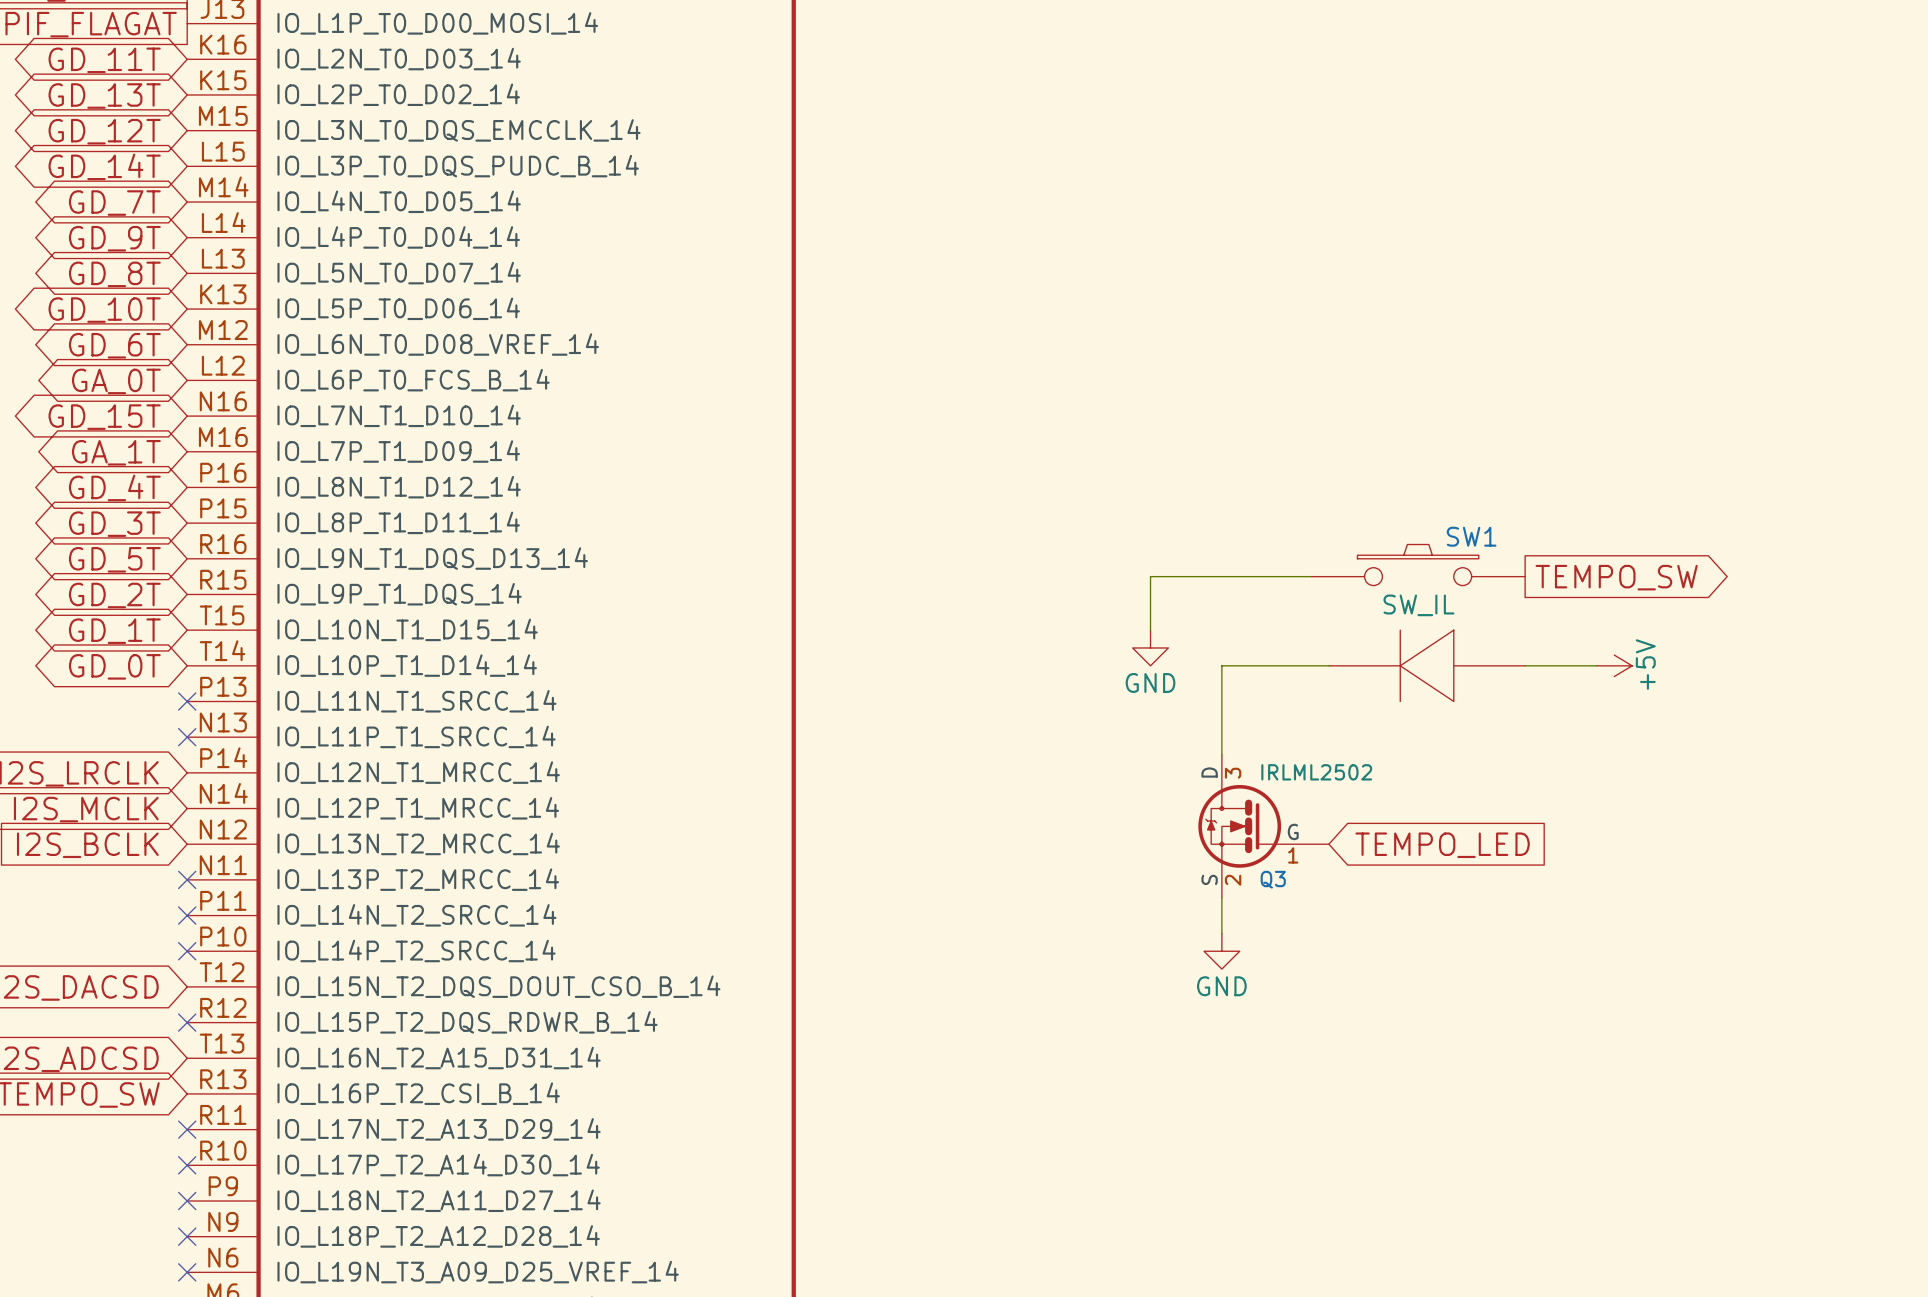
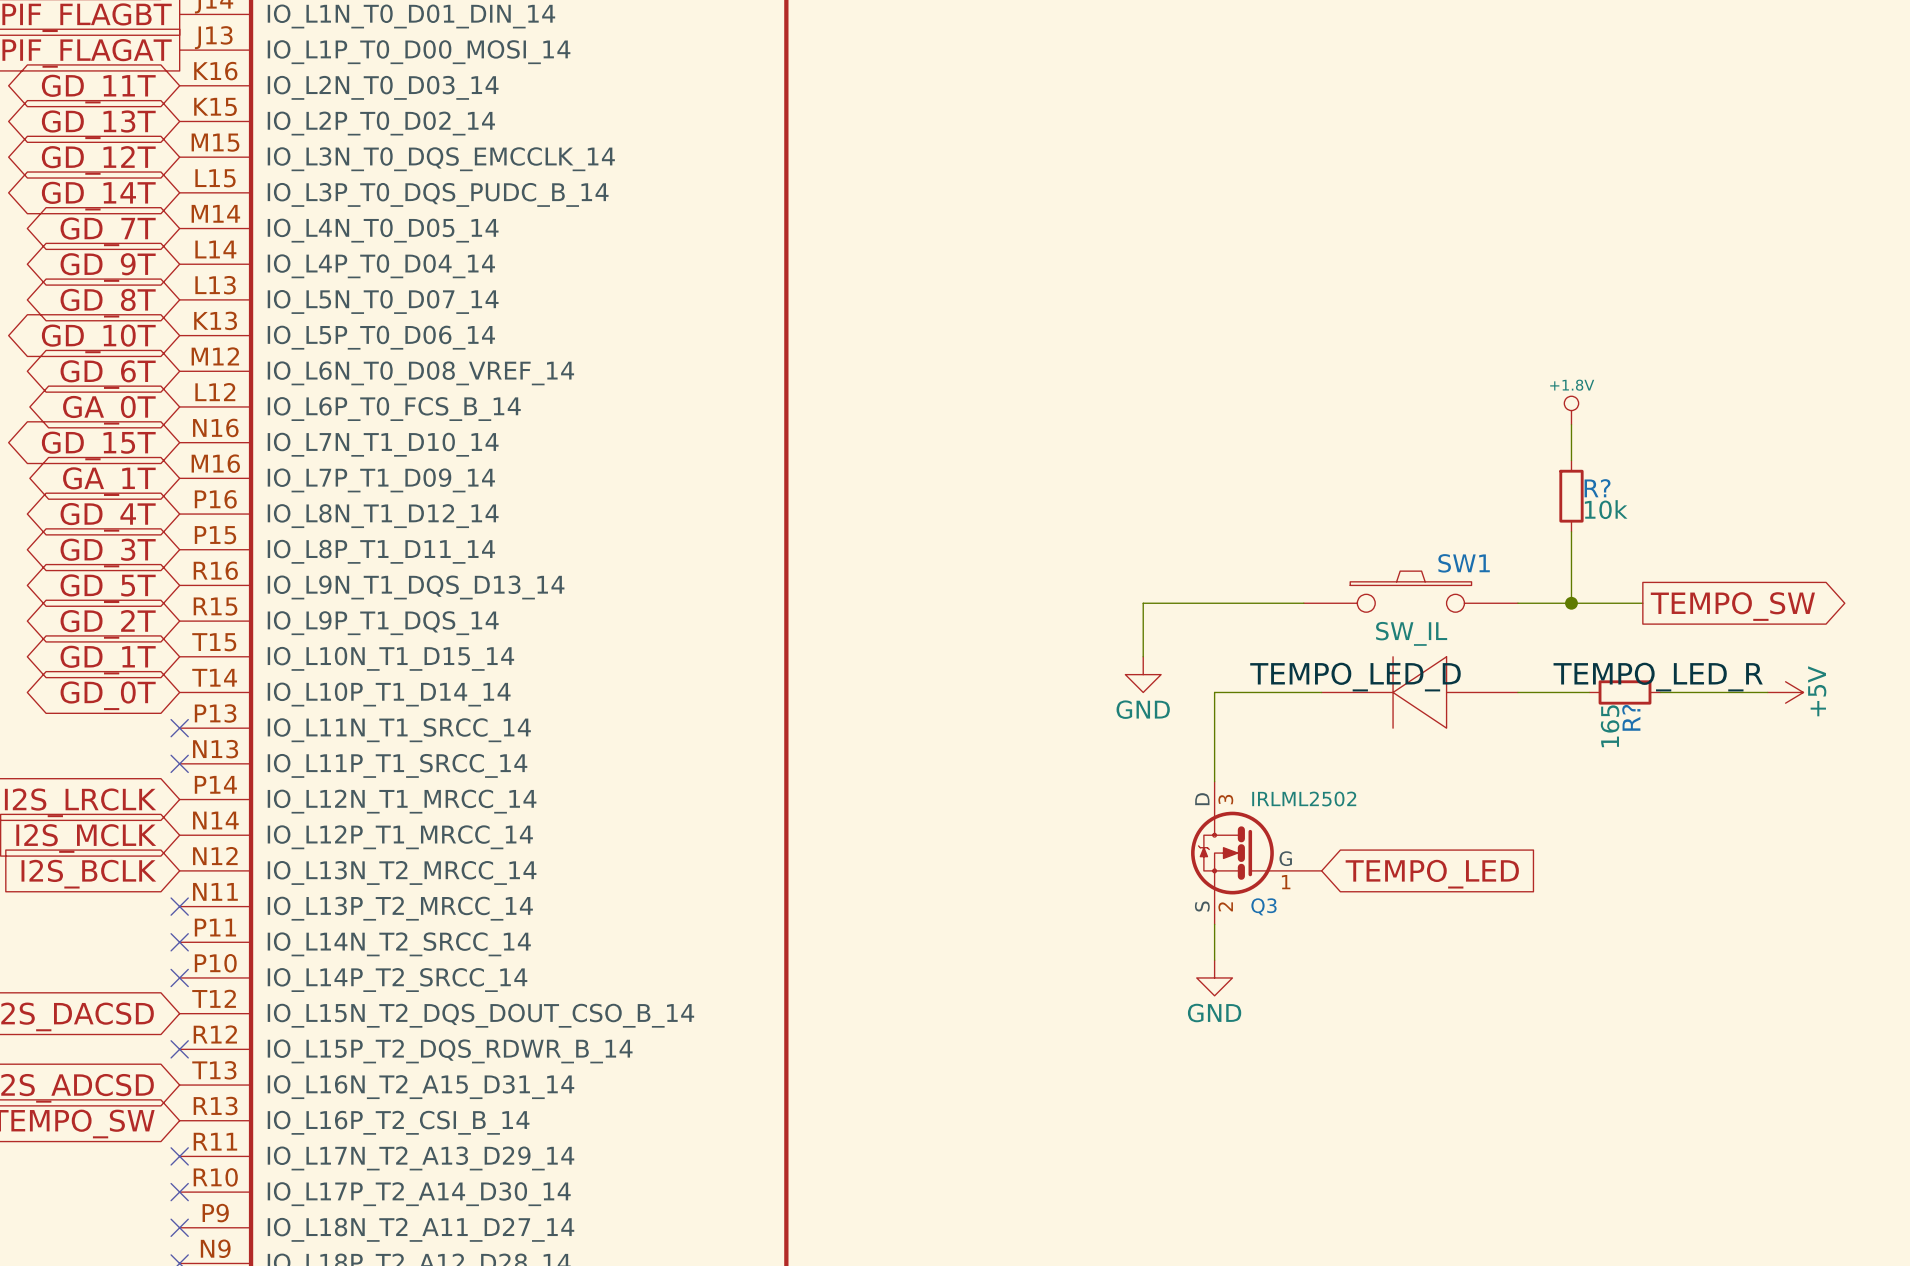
power symbol: none -> +1.8V (1571, 410)
wire: none -> (1571, 424) (1571, 460)
R?: none -> 10k (1571, 496)
wire: none -> (1571, 531) (1571, 603)
wire: none -> (1517, 603) (1642, 603)
junction: none -> (1571, 603)
global label position: TEMPO_SW (1616, 577) -> TEMPO_SW (1732, 606)
label: none -> TEMPO_LED_D (1355, 677)
label: none -> TEMPO_LED_R (1658, 677)
power symbol position: +5V (1614, 665) -> +5V (1785, 692)
R?: none -> 165 (1625, 692)
wire: none -> (1660, 692) (1767, 692)

